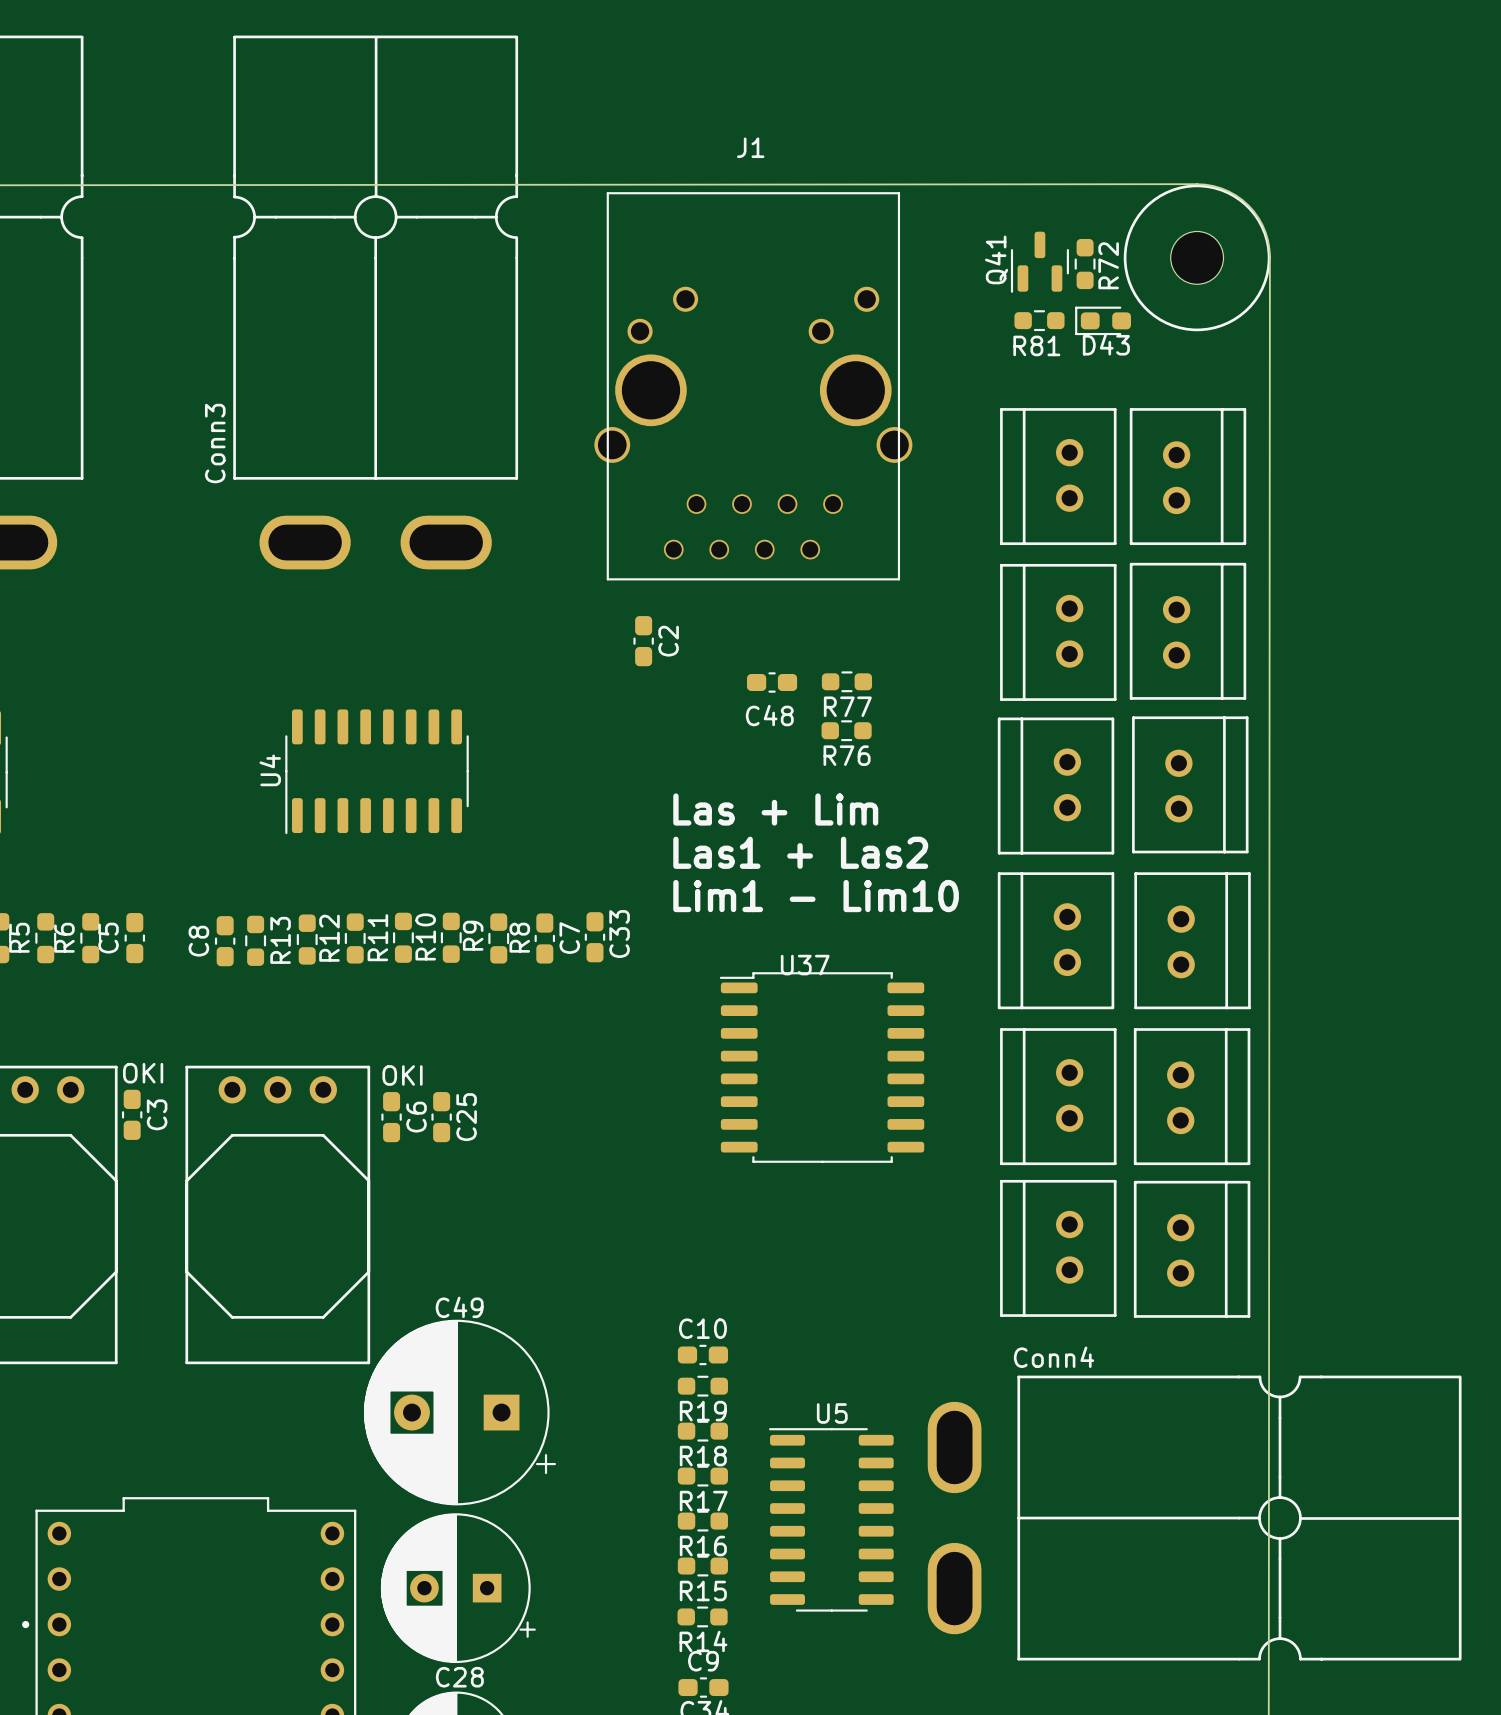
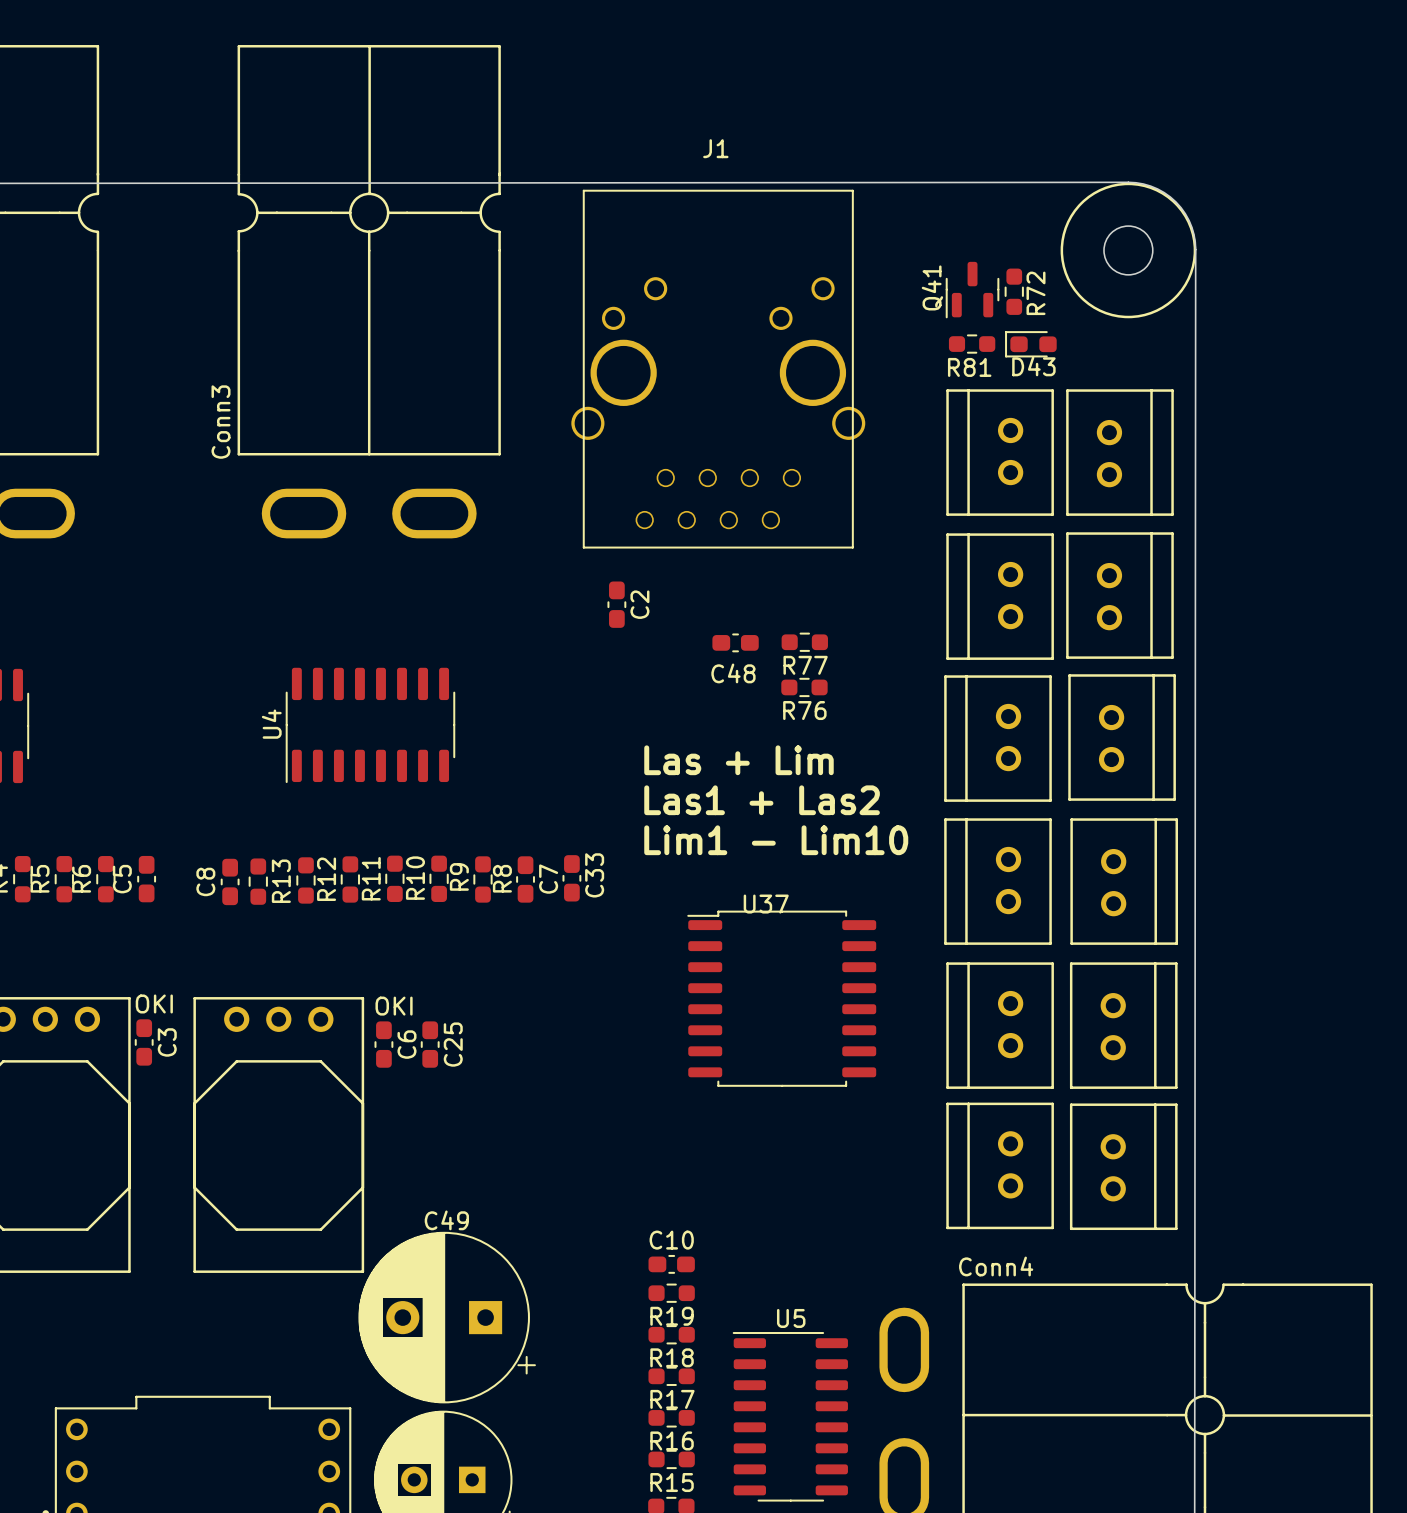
Q41 position: (1039, 262) -> (972, 290)
R72 position: (1085, 264) -> (1014, 291)
R81 position: (1039, 320) -> (972, 344)
D43 position: (1103, 320) -> (1030, 344)

